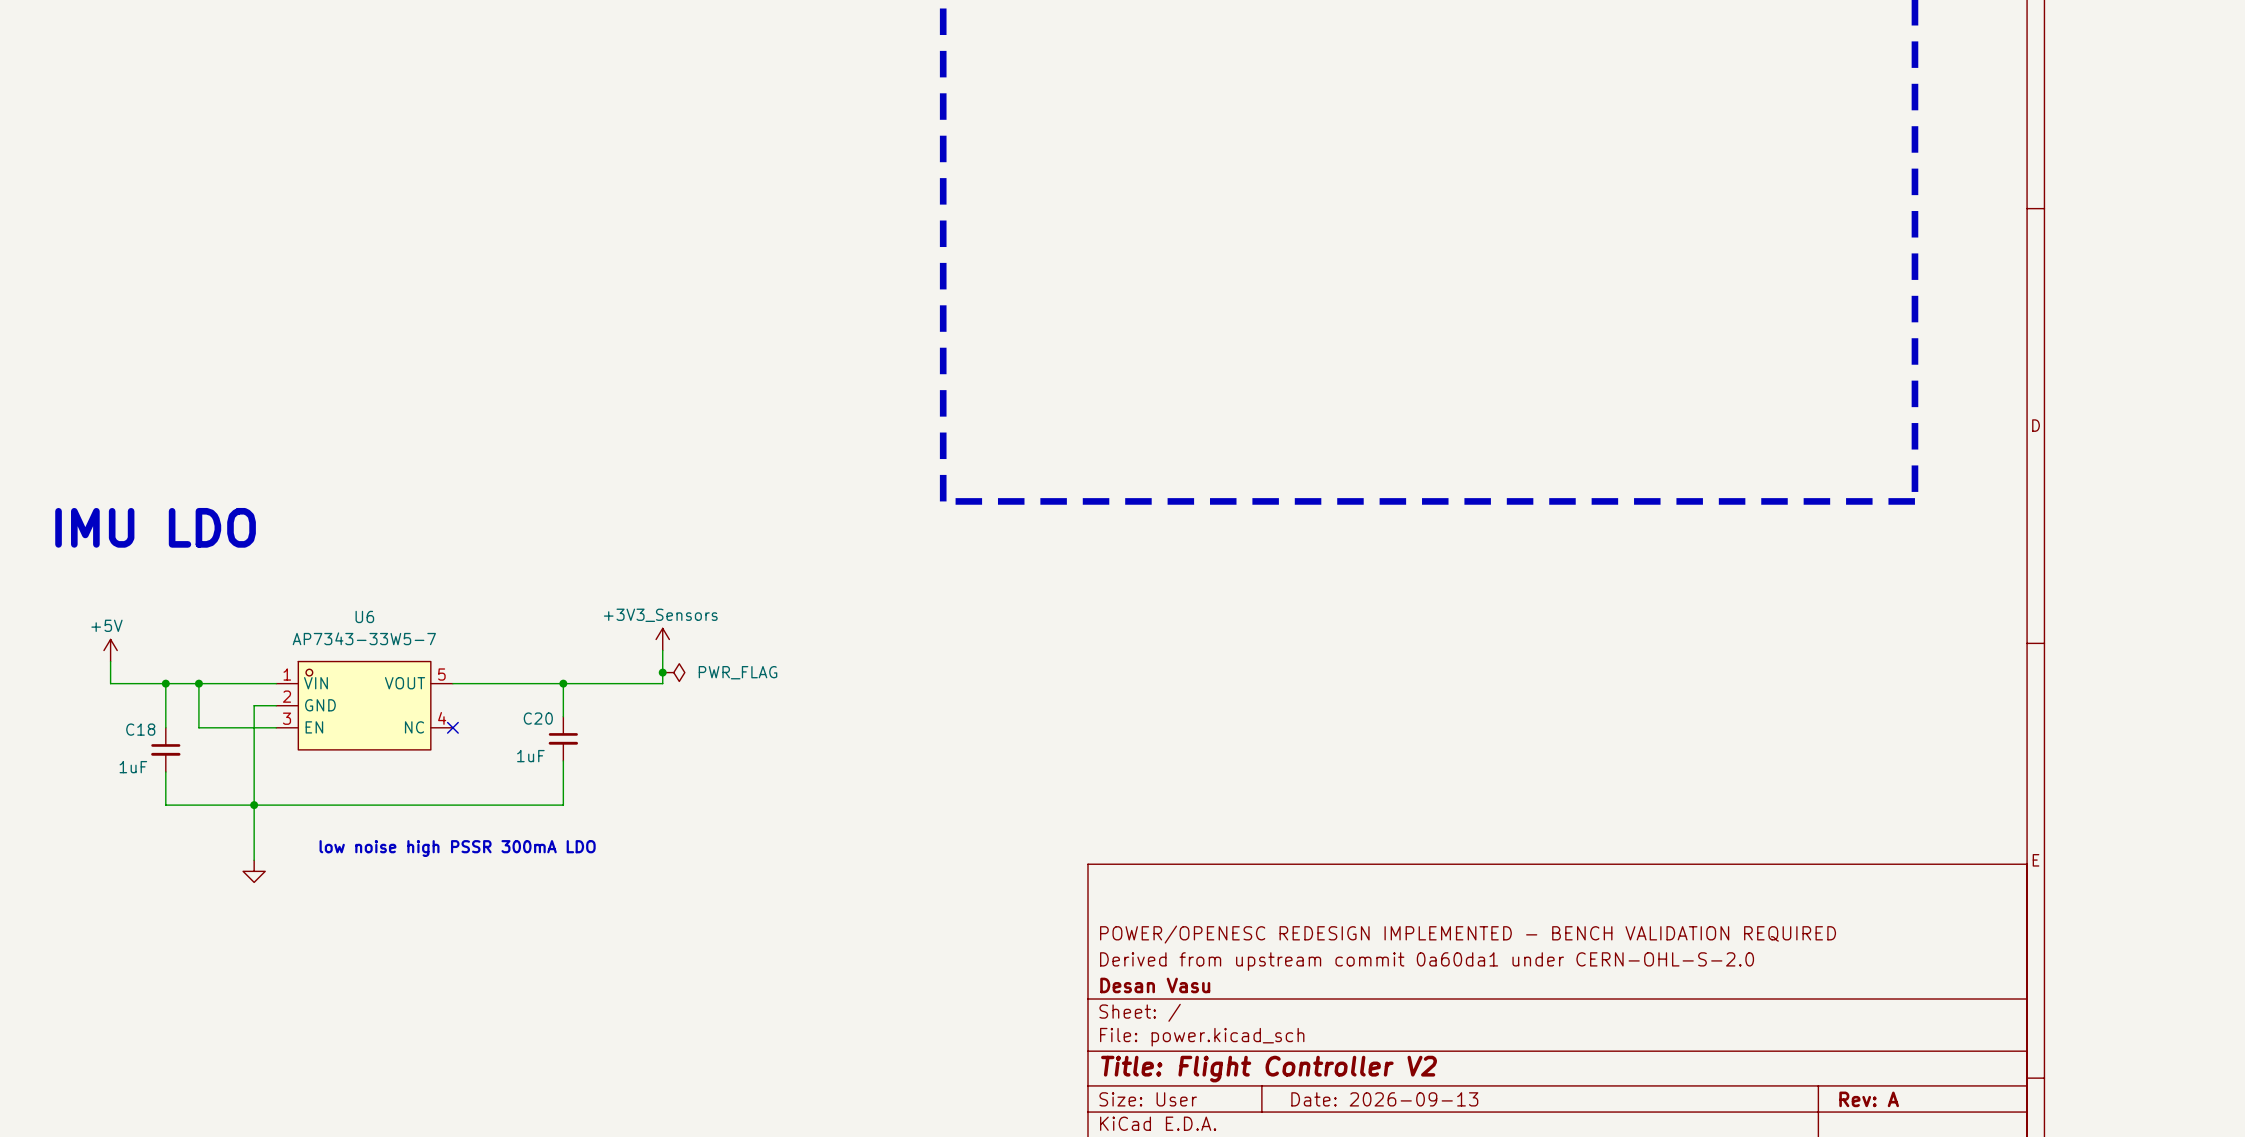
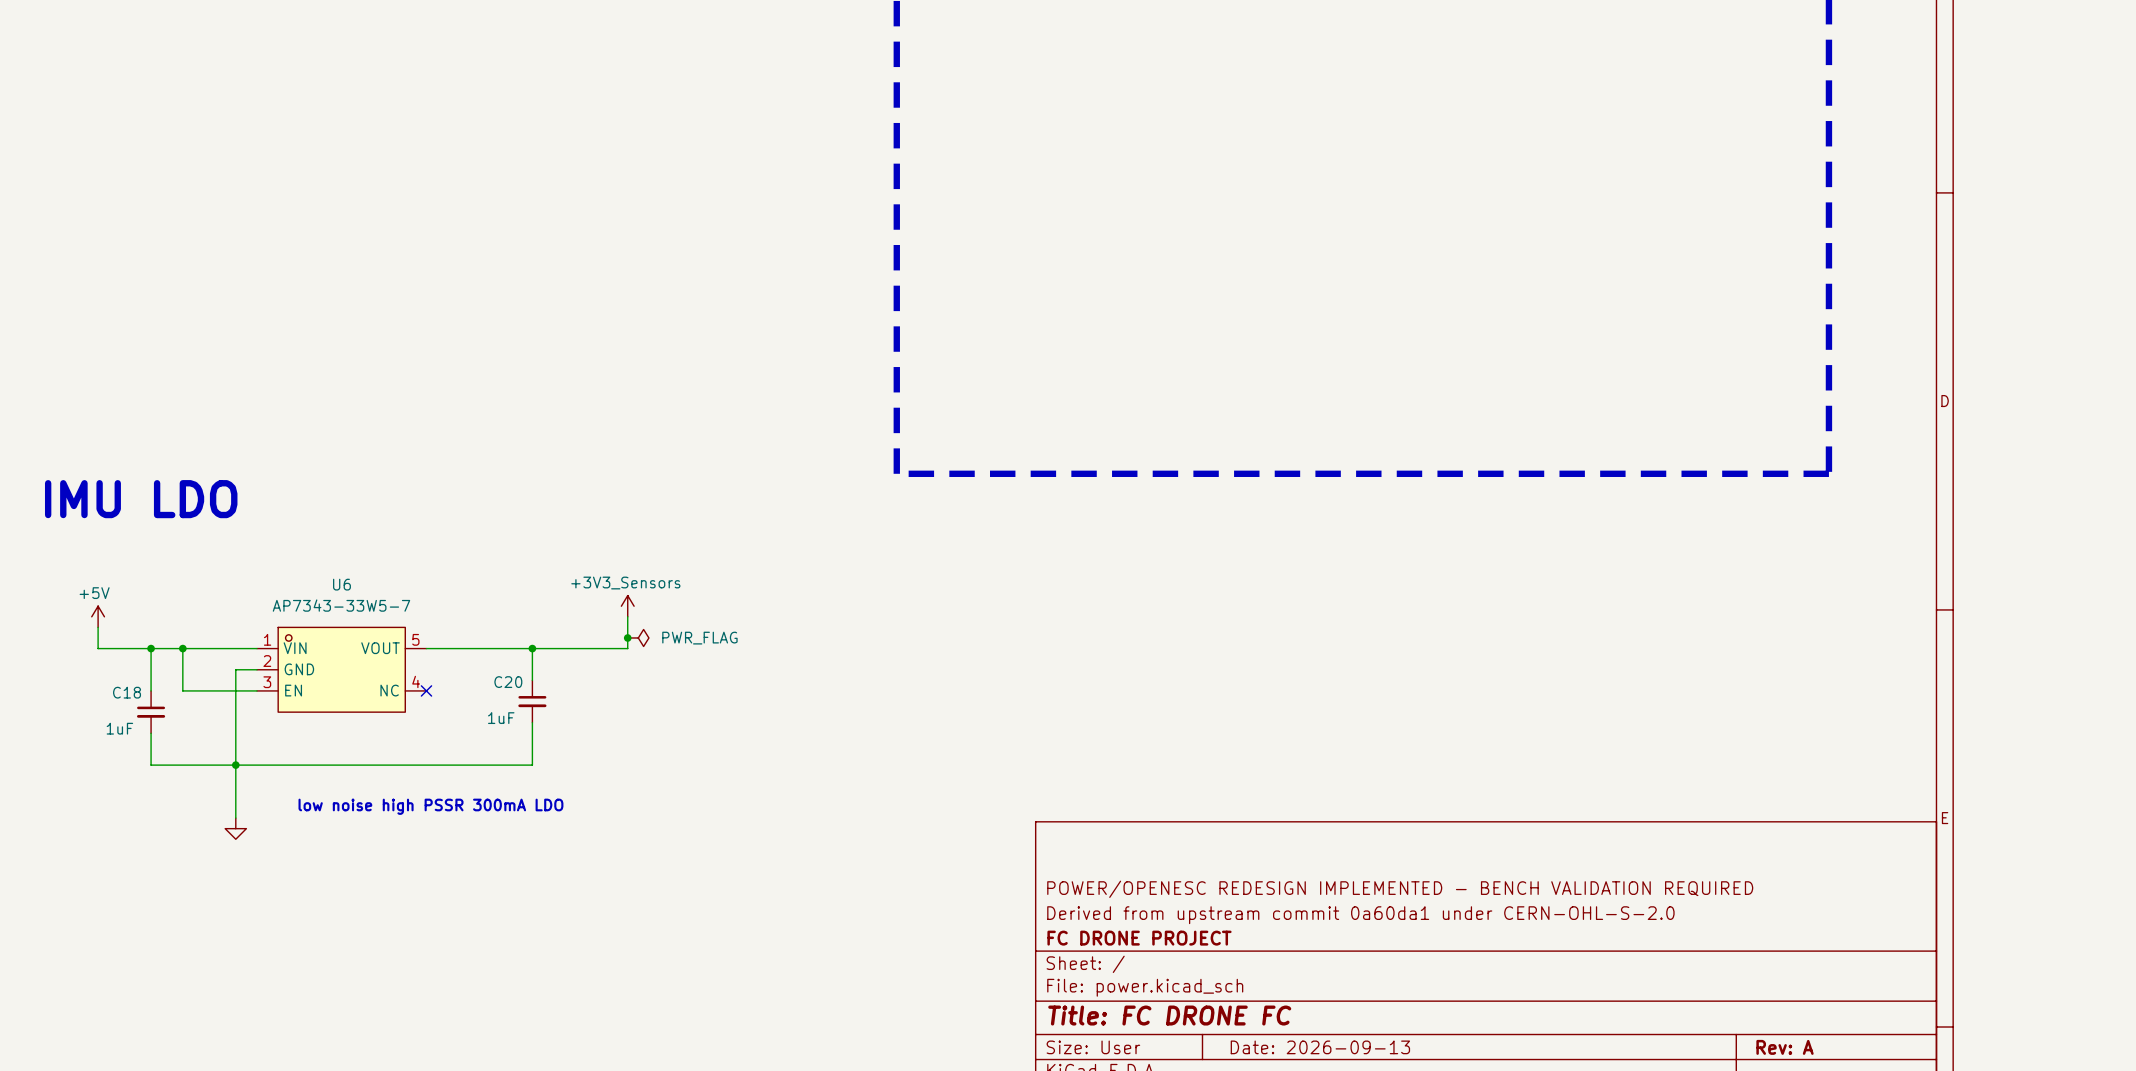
title block: Desan Vasu (1155, 985) -> FC DRONE PROJECT (1139, 938)
title block: Title: Flight Controller V2 (1269, 1069) -> Title: FC DRONE FC (1169, 1015)

